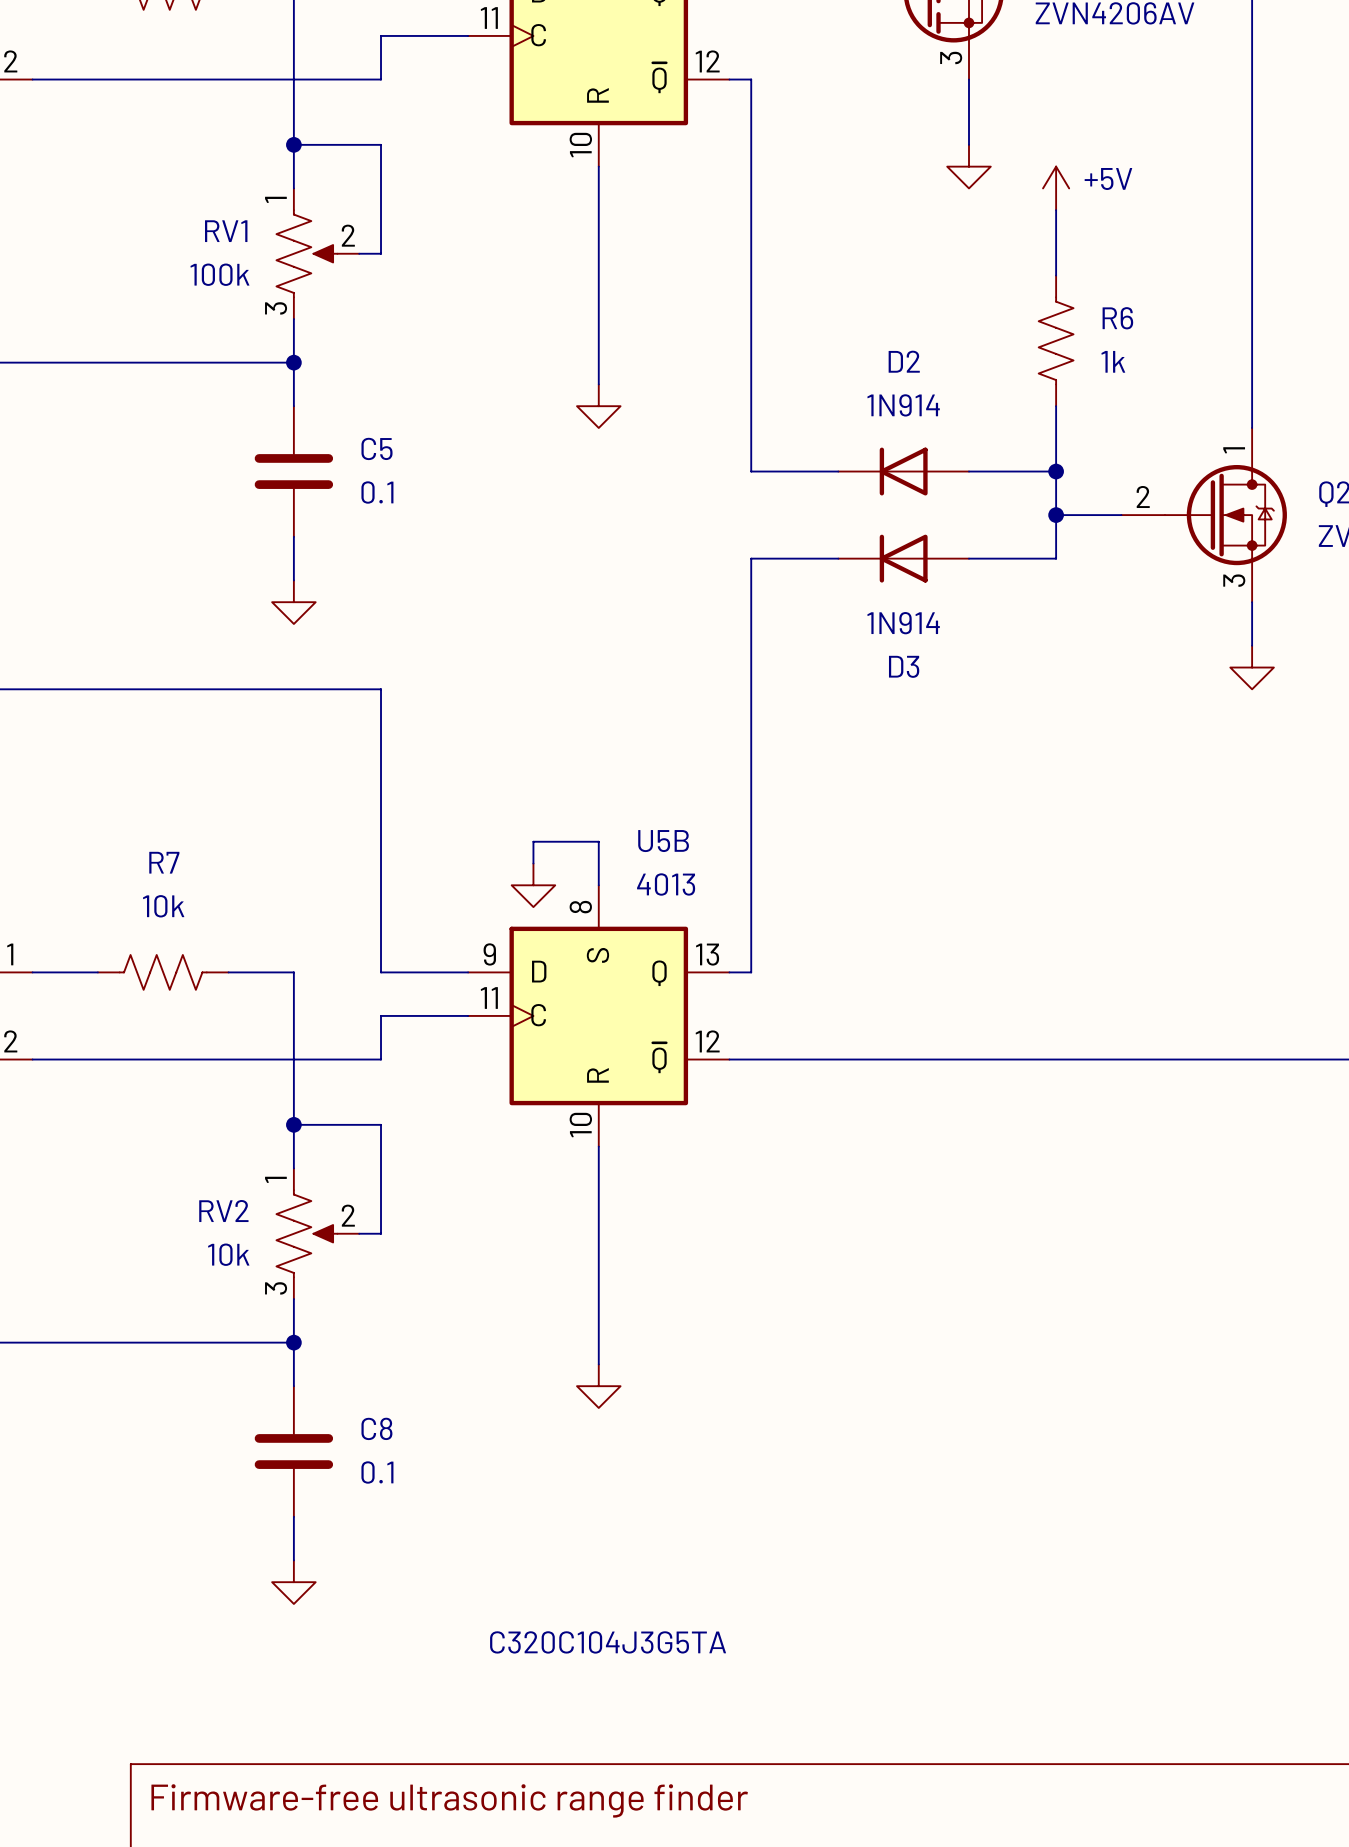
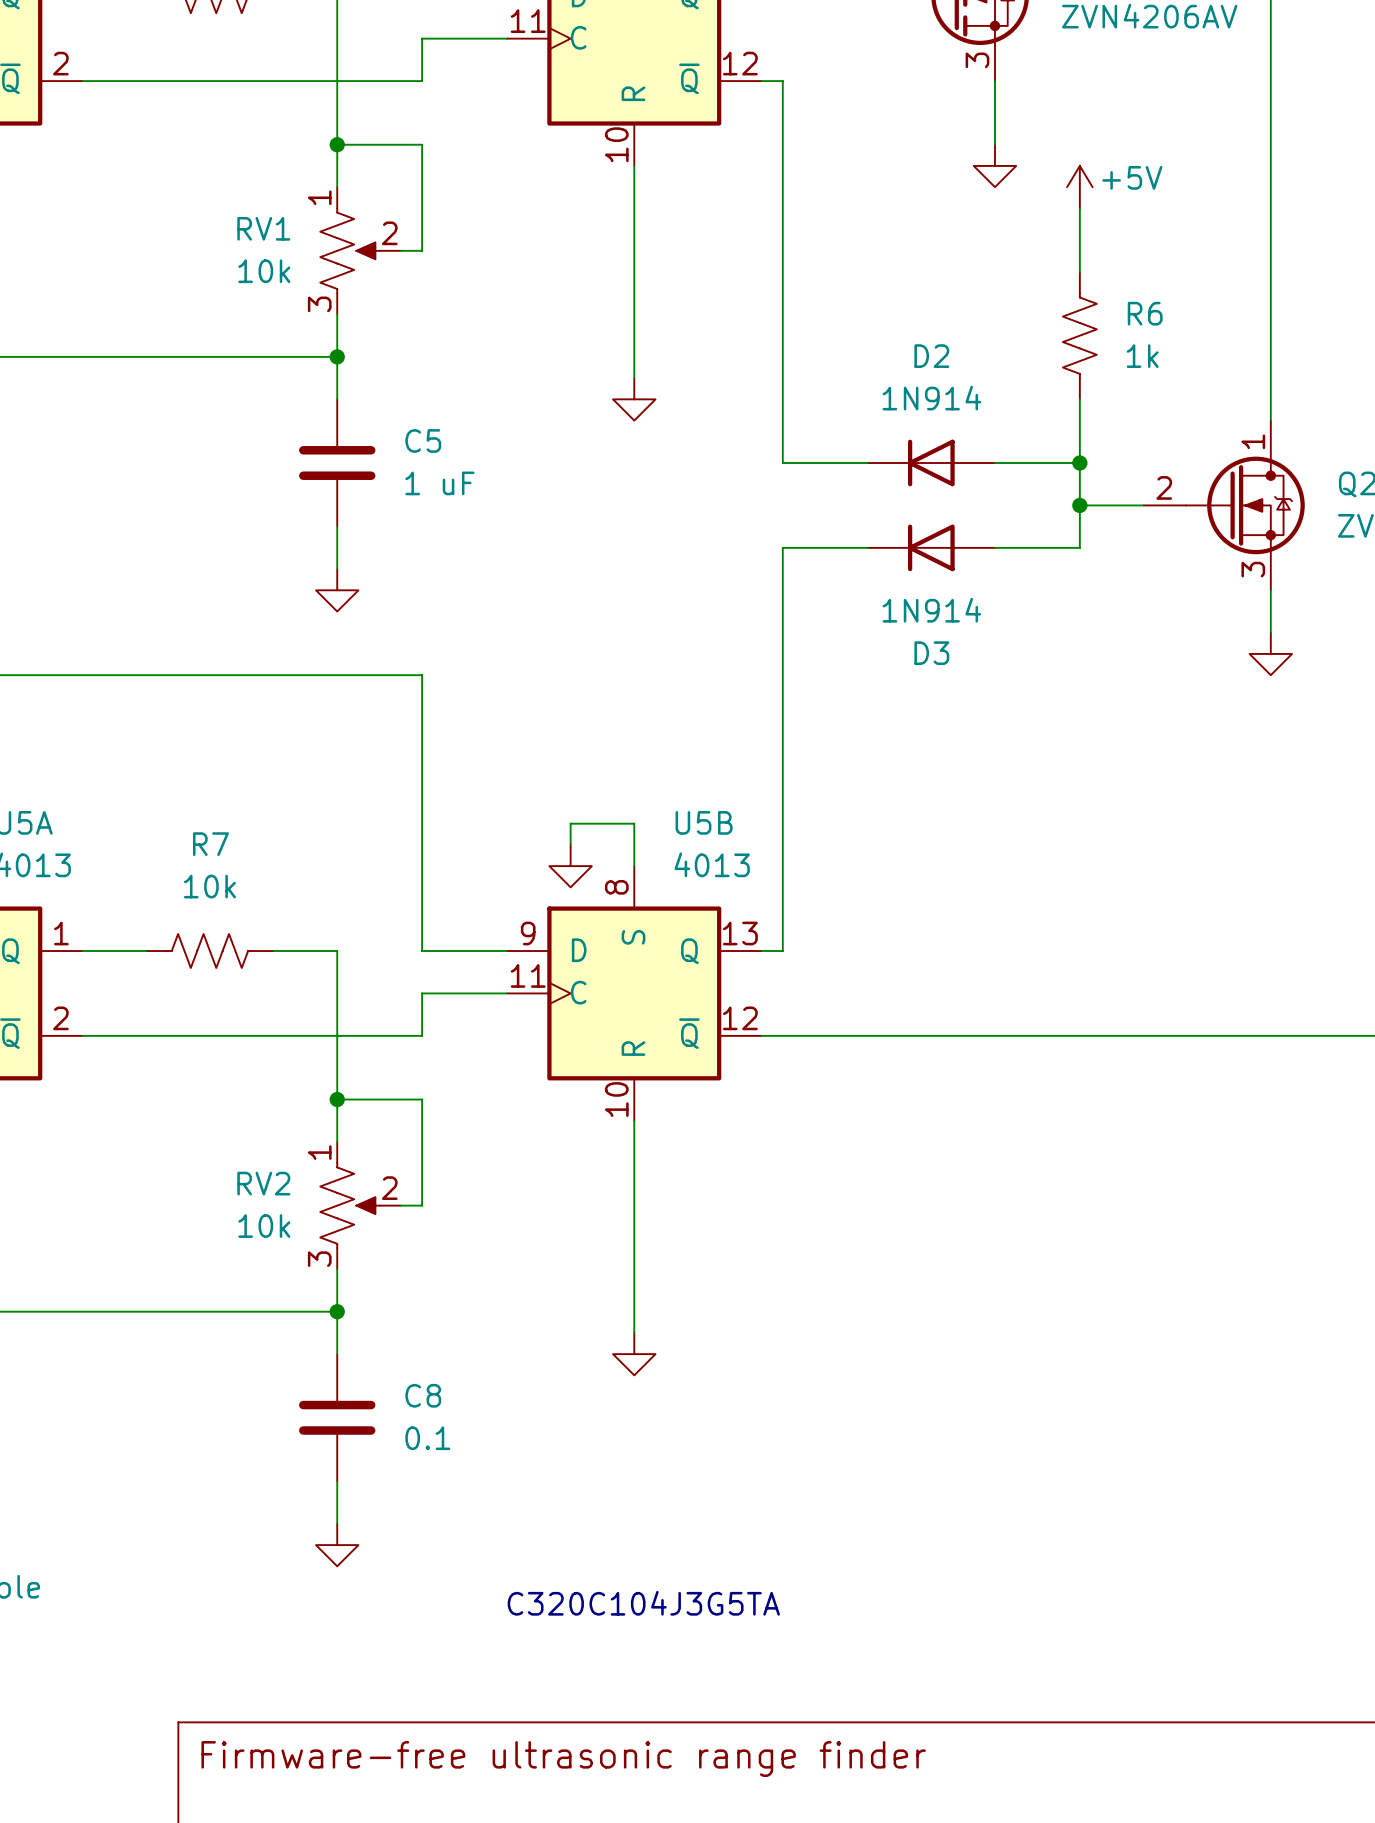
RV1 value: 100k (219, 274) -> 10k (264, 271)
C5 value: 0.1 (377, 492) -> 1 uF (439, 483)

